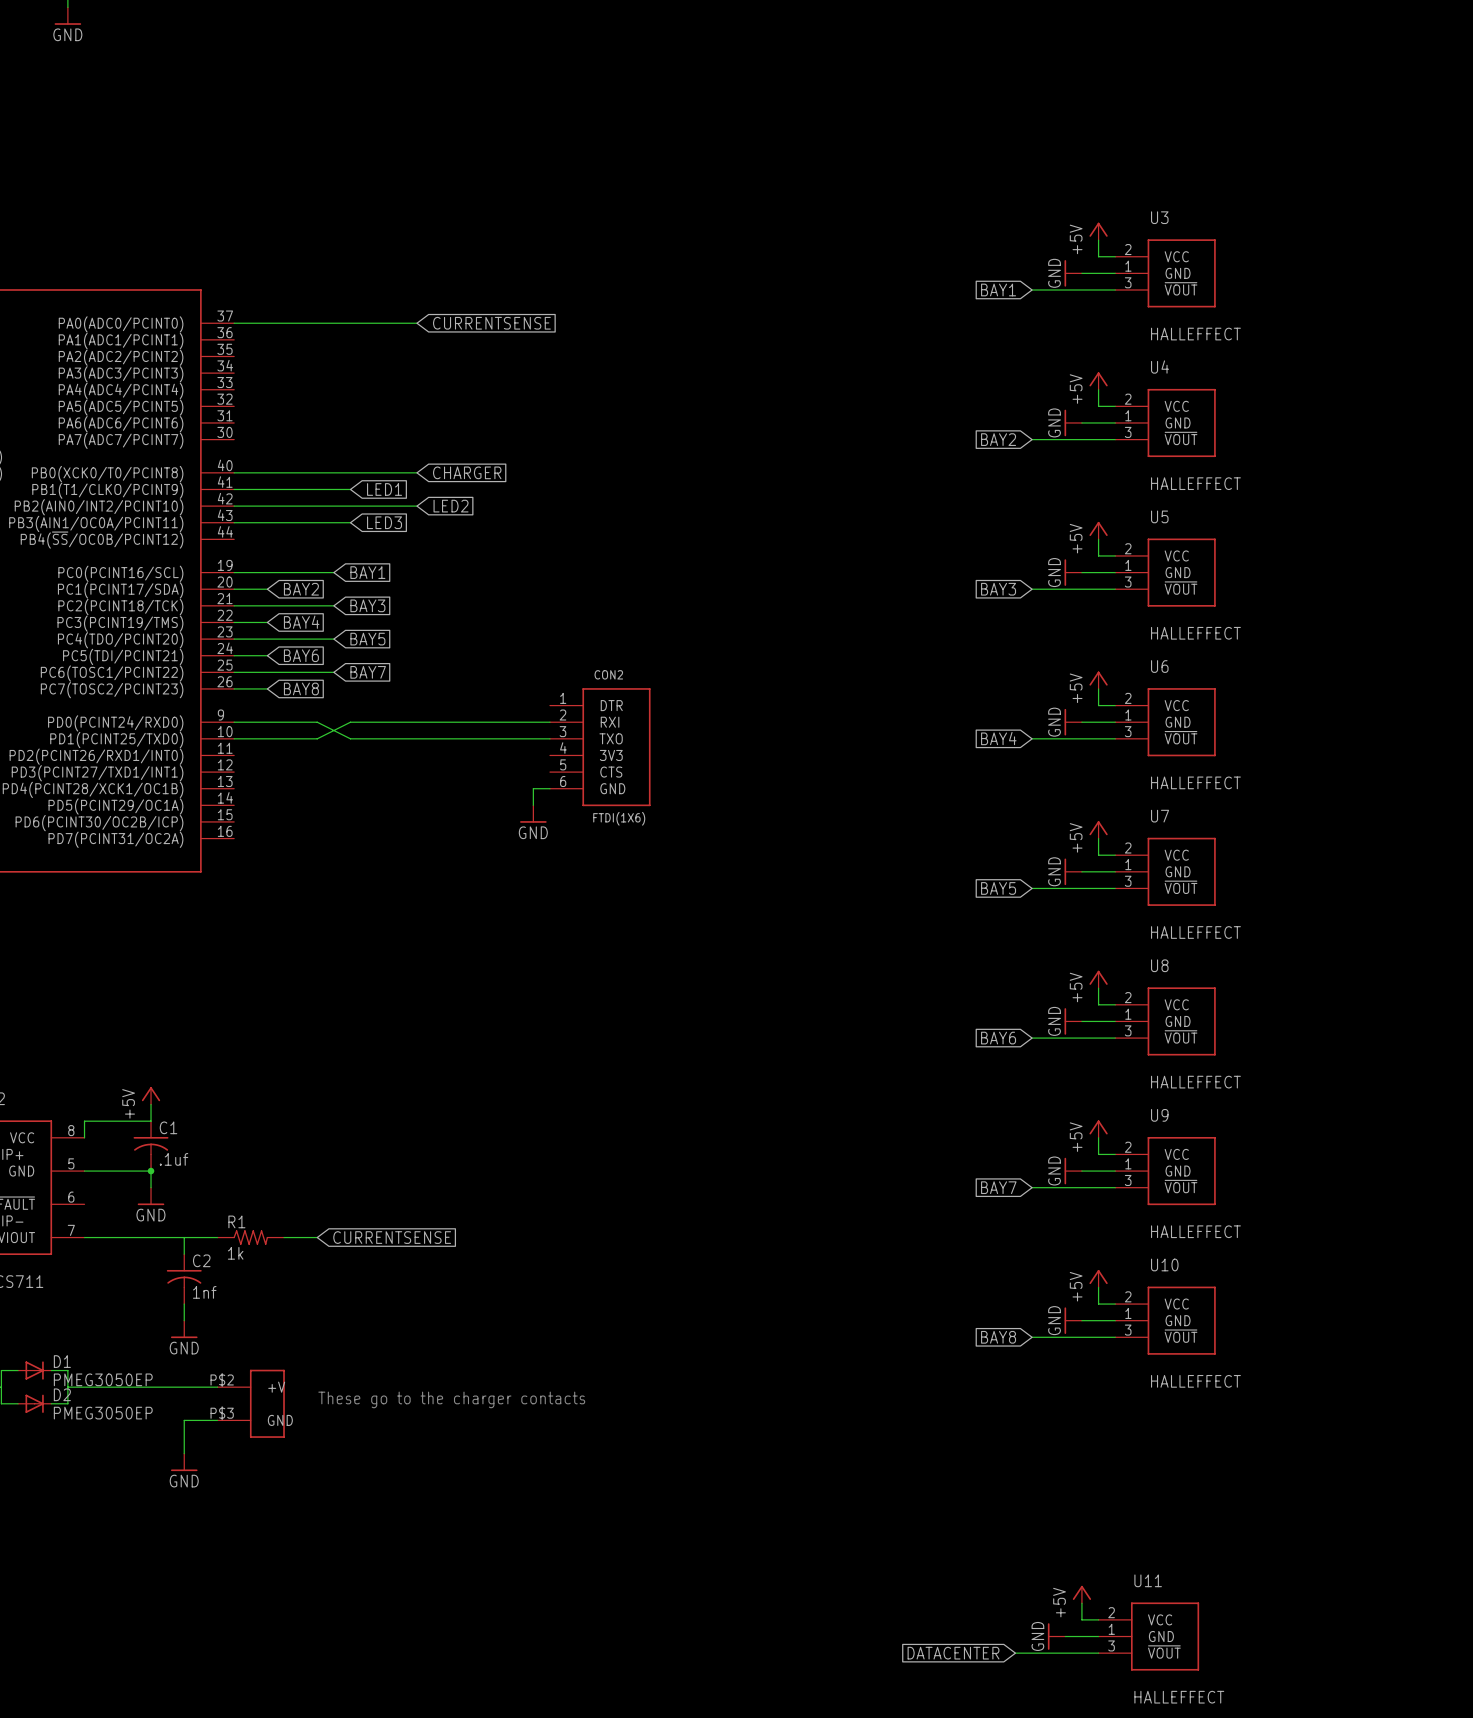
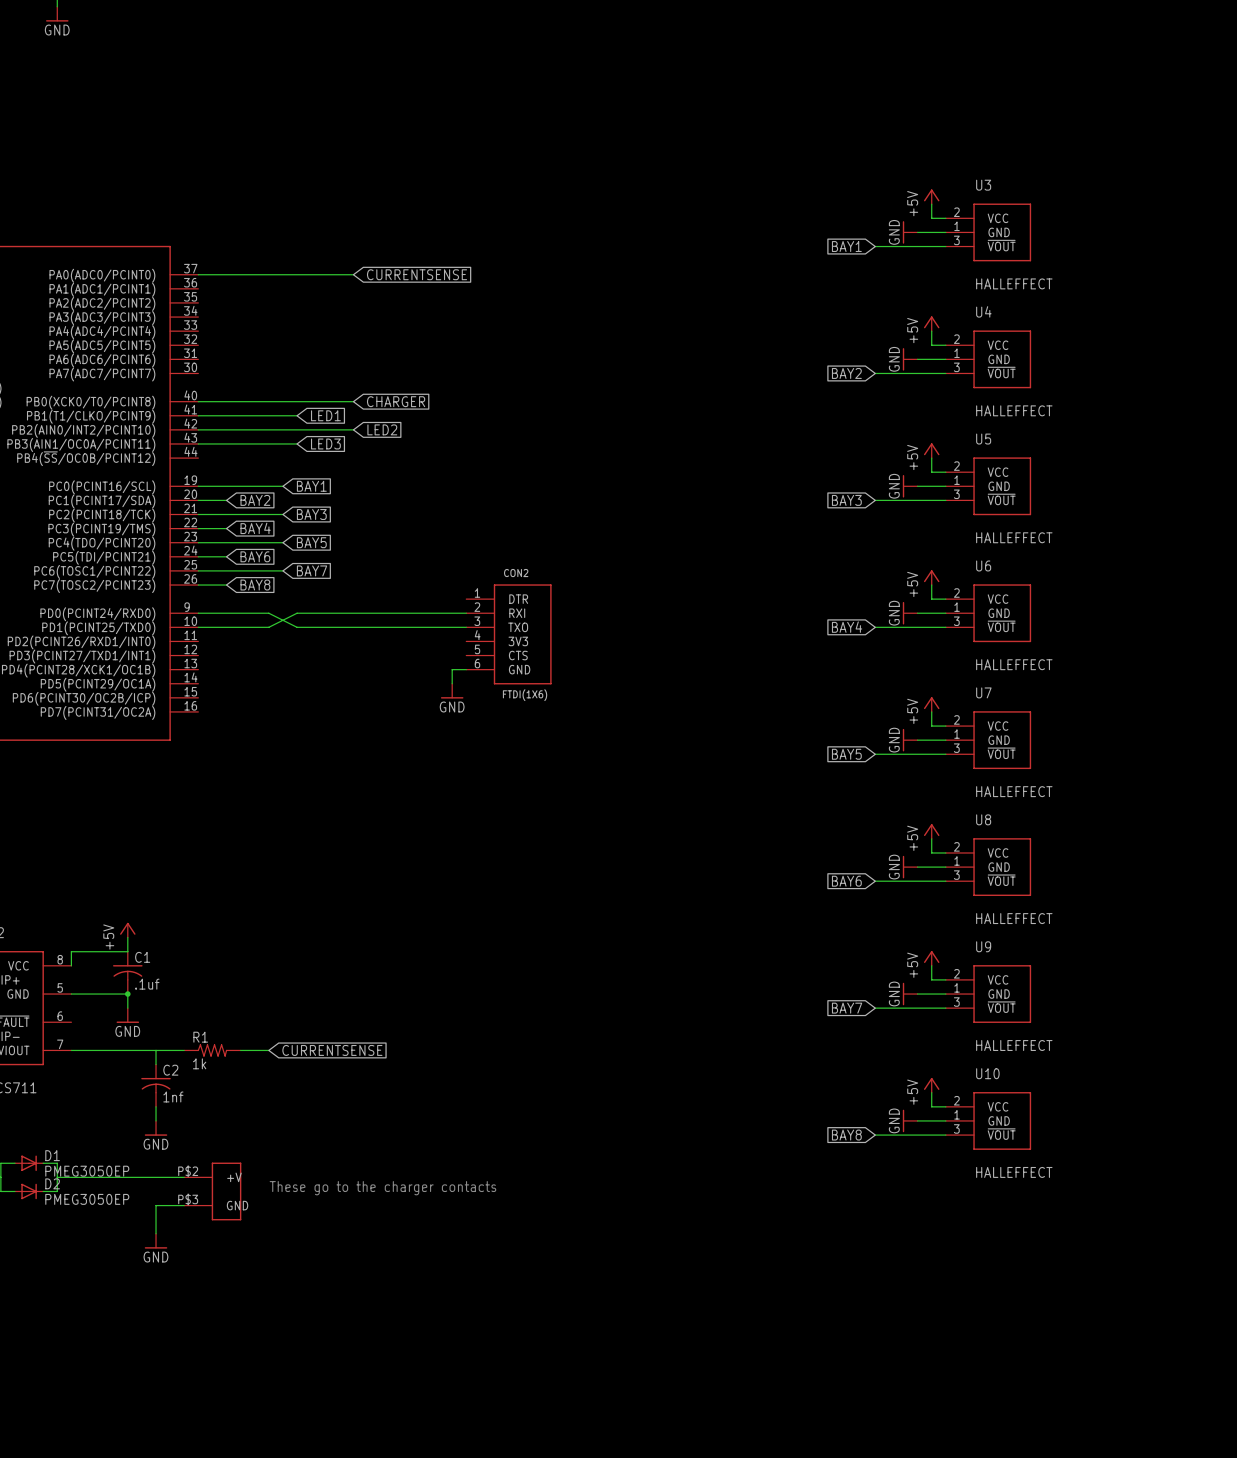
power symbol: +5V (1081, 1594) -> none
wire: (1081, 1603) (1081, 1619) (1098, 1619) -> none
power symbol: GND (1056, 1636) -> none
wire: (1065, 1636) (1098, 1636) -> none
U11: HALLEFFECT (1148, 1636) -> none
global label: DATACENTER (953, 1653) -> none
wire: (1015, 1653) (1098, 1653) -> none

